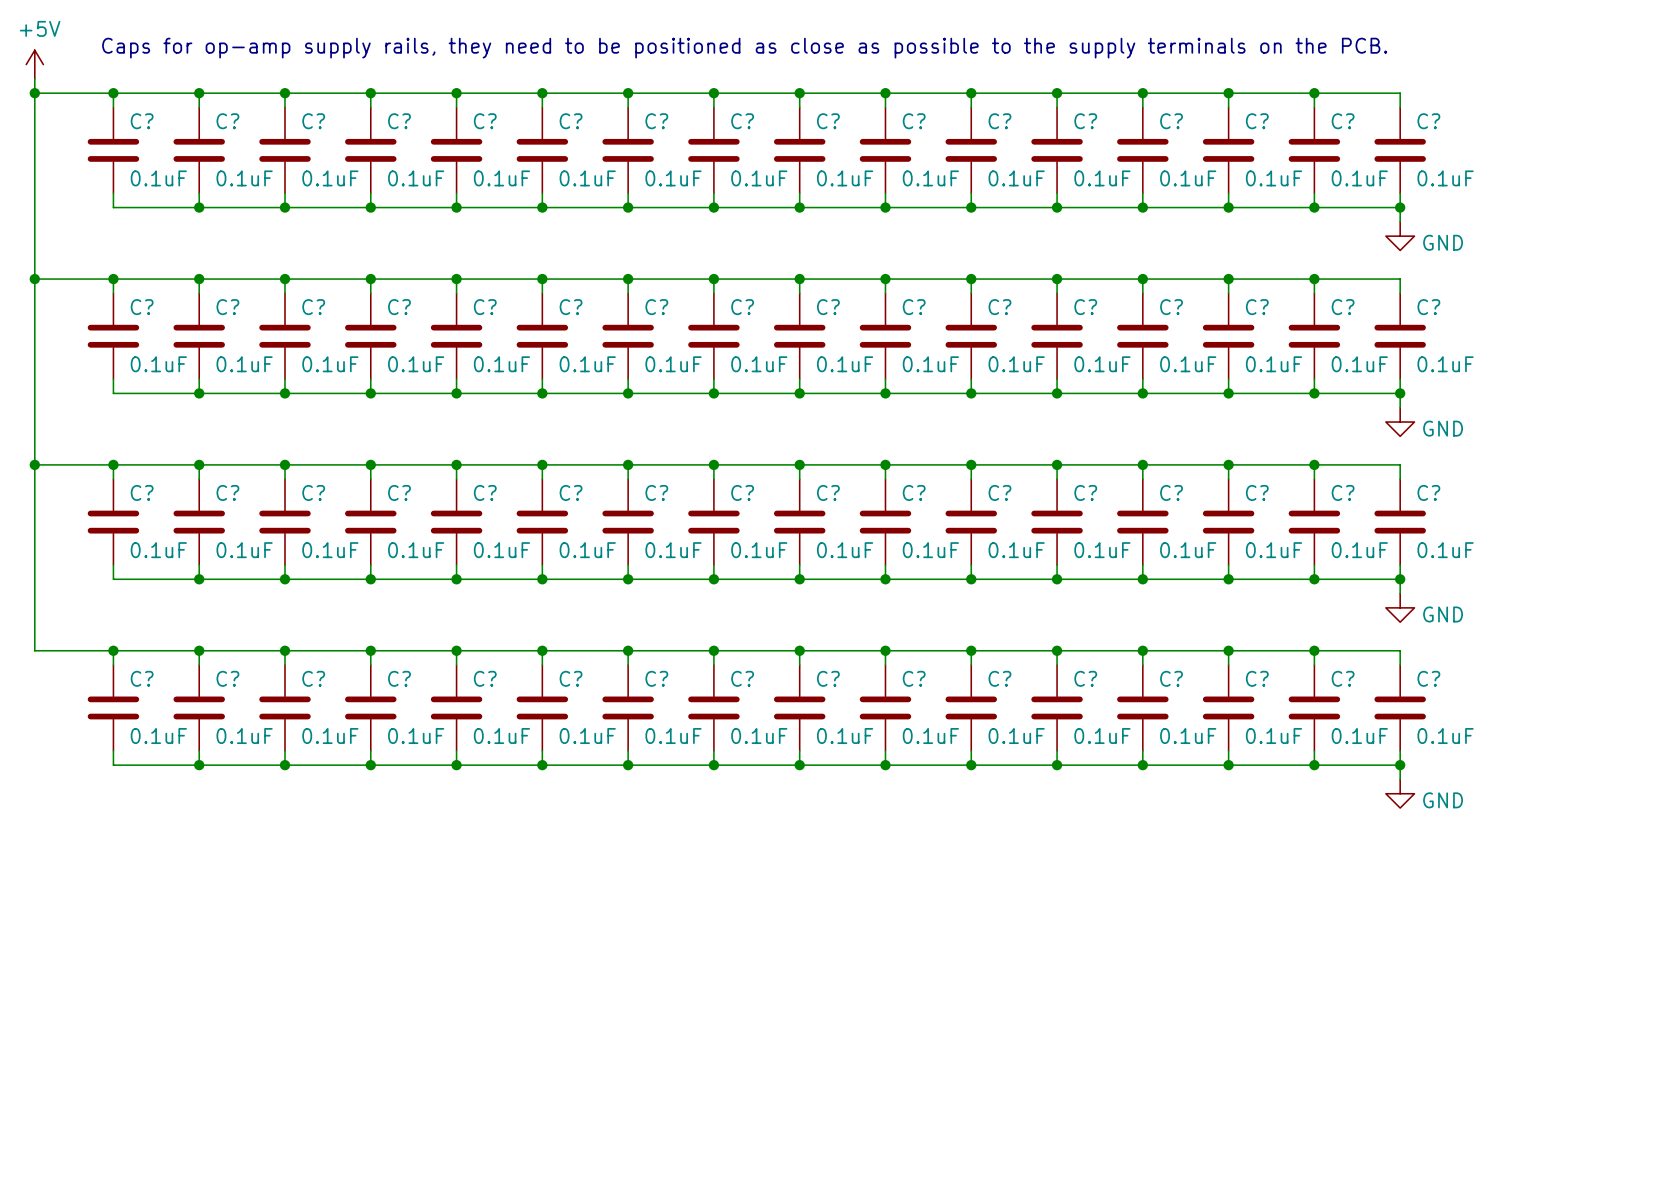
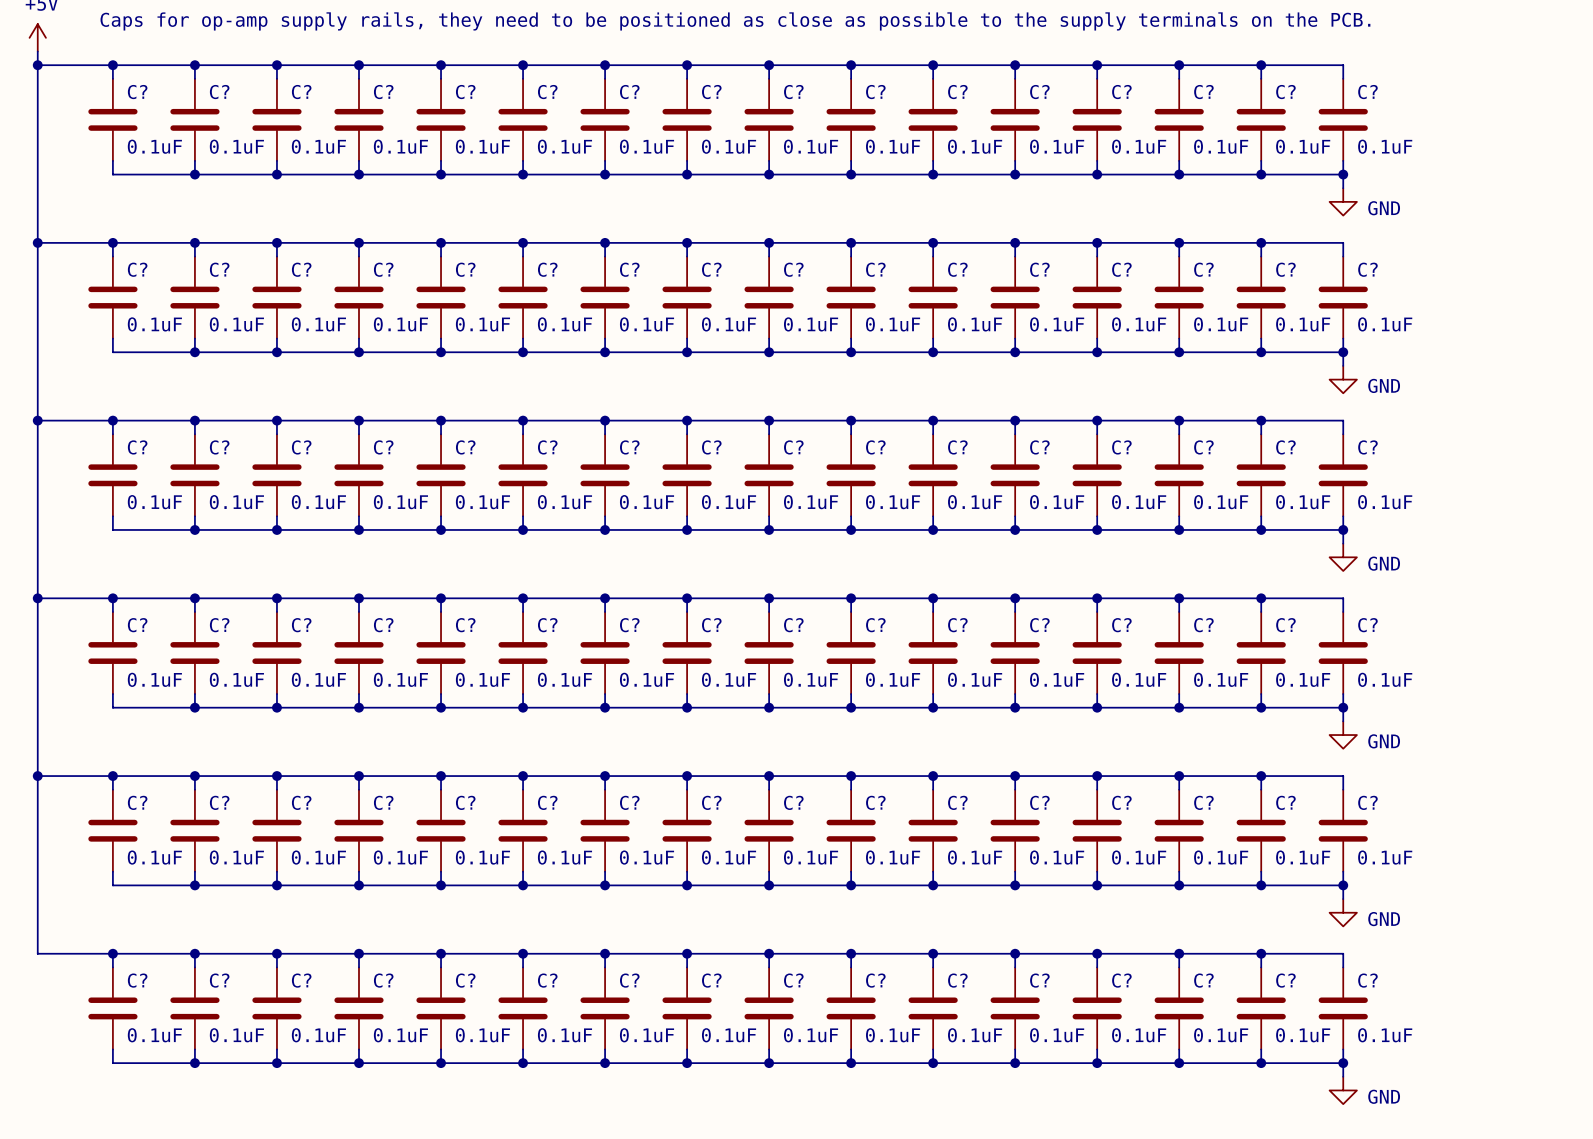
wire: none -> (37, 598) (37, 953) (1343, 953) (1343, 967)
junction: none -> (37, 598)
wire: none -> (37, 776) (1343, 776) (1343, 789)
junction: none -> (37, 776)
wire: none -> (112, 776) (112, 789)
junction: none -> (112, 776)
wire: none -> (194, 776) (194, 789)
junction: none -> (194, 776)
wire: none -> (276, 776) (276, 789)
junction: none -> (276, 776)
wire: none -> (358, 776) (358, 789)
junction: none -> (358, 776)
wire: none -> (441, 776) (441, 789)
junction: none -> (441, 776)
wire: none -> (523, 776) (523, 789)
junction: none -> (523, 776)
wire: none -> (605, 776) (605, 789)
junction: none -> (605, 776)
wire: none -> (687, 776) (687, 789)
junction: none -> (687, 776)
wire: none -> (769, 776) (769, 789)
junction: none -> (769, 776)
wire: none -> (851, 776) (851, 789)
junction: none -> (851, 776)
wire: none -> (933, 776) (933, 789)
junction: none -> (933, 776)
wire: none -> (1015, 776) (1015, 789)
junction: none -> (1015, 776)
wire: none -> (1097, 776) (1097, 789)
junction: none -> (1097, 776)
wire: none -> (1179, 776) (1179, 789)
junction: none -> (1179, 776)
wire: none -> (1261, 776) (1261, 789)
junction: none -> (1261, 776)
C?: none -> 0.1uF (112, 830)
C?: none -> 0.1uF (194, 830)
C?: none -> 0.1uF (276, 830)
C?: none -> 0.1uF (358, 830)
C?: none -> 0.1uF (441, 830)
C?: none -> 0.1uF (523, 830)
C?: none -> 0.1uF (605, 830)
C?: none -> 0.1uF (687, 830)
C?: none -> 0.1uF (769, 830)
C?: none -> 0.1uF (851, 830)
C?: none -> 0.1uF (933, 830)
C?: none -> 0.1uF (1015, 830)
C?: none -> 0.1uF (1097, 830)
C?: none -> 0.1uF (1179, 830)
C?: none -> 0.1uF (1261, 830)
C?: none -> 0.1uF (1343, 830)
wire: none -> (112, 871) (112, 885) (1343, 885)
wire: none -> (194, 871) (194, 885)
wire: none -> (276, 871) (276, 885)
wire: none -> (358, 871) (358, 885)
wire: none -> (441, 871) (441, 885)
wire: none -> (523, 871) (523, 885)
wire: none -> (605, 871) (605, 885)
wire: none -> (687, 871) (687, 885)
wire: none -> (769, 871) (769, 885)
wire: none -> (851, 871) (851, 885)
wire: none -> (933, 871) (933, 885)
wire: none -> (1015, 871) (1015, 885)
wire: none -> (1097, 871) (1097, 885)
wire: none -> (1179, 871) (1179, 885)
wire: none -> (1261, 871) (1261, 885)
wire: none -> (1343, 871) (1343, 899)
junction: none -> (194, 885)
junction: none -> (276, 885)
junction: none -> (358, 885)
junction: none -> (441, 885)
junction: none -> (523, 885)
junction: none -> (605, 885)
junction: none -> (687, 885)
junction: none -> (769, 885)
junction: none -> (851, 885)
junction: none -> (933, 885)
junction: none -> (1015, 885)
junction: none -> (1097, 885)
junction: none -> (1179, 885)
junction: none -> (1261, 885)
junction: none -> (1343, 885)
power symbol: none -> GND (1343, 912)
wire: none -> (112, 953) (112, 967)
junction: none -> (112, 953)
wire: none -> (194, 953) (194, 967)
junction: none -> (194, 953)
wire: none -> (276, 953) (276, 967)
junction: none -> (276, 953)
wire: none -> (358, 953) (358, 967)
junction: none -> (358, 953)
wire: none -> (441, 953) (441, 967)
junction: none -> (441, 953)
wire: none -> (523, 953) (523, 967)
junction: none -> (523, 953)
wire: none -> (605, 953) (605, 967)
junction: none -> (605, 953)
wire: none -> (687, 953) (687, 967)
junction: none -> (687, 953)
wire: none -> (769, 953) (769, 967)
junction: none -> (769, 953)
wire: none -> (851, 953) (851, 967)
junction: none -> (851, 953)
wire: none -> (933, 953) (933, 967)
junction: none -> (933, 953)
wire: none -> (1015, 953) (1015, 967)
junction: none -> (1015, 953)
wire: none -> (1097, 953) (1097, 967)
junction: none -> (1097, 953)
wire: none -> (1179, 953) (1179, 967)
junction: none -> (1179, 953)
wire: none -> (1261, 953) (1261, 967)
junction: none -> (1261, 953)
C?: none -> 0.1uF (112, 1008)
C?: none -> 0.1uF (194, 1008)
C?: none -> 0.1uF (276, 1008)
C?: none -> 0.1uF (358, 1008)
C?: none -> 0.1uF (441, 1008)
C?: none -> 0.1uF (523, 1008)
C?: none -> 0.1uF (605, 1008)
C?: none -> 0.1uF (687, 1008)
C?: none -> 0.1uF (769, 1008)
C?: none -> 0.1uF (851, 1008)
C?: none -> 0.1uF (933, 1008)
C?: none -> 0.1uF (1015, 1008)
C?: none -> 0.1uF (1097, 1008)
C?: none -> 0.1uF (1179, 1008)
C?: none -> 0.1uF (1261, 1008)
C?: none -> 0.1uF (1343, 1008)
wire: none -> (112, 1049) (112, 1063) (1343, 1063)
wire: none -> (194, 1049) (194, 1063)
wire: none -> (276, 1049) (276, 1063)
wire: none -> (358, 1049) (358, 1063)
wire: none -> (441, 1049) (441, 1063)
wire: none -> (523, 1049) (523, 1063)
wire: none -> (605, 1049) (605, 1063)
wire: none -> (687, 1049) (687, 1063)
wire: none -> (769, 1049) (769, 1063)
wire: none -> (851, 1049) (851, 1063)
wire: none -> (933, 1049) (933, 1063)
wire: none -> (1015, 1049) (1015, 1063)
wire: none -> (1097, 1049) (1097, 1063)
wire: none -> (1179, 1049) (1179, 1063)
wire: none -> (1261, 1049) (1261, 1063)
wire: none -> (1343, 1049) (1343, 1076)
junction: none -> (194, 1063)
junction: none -> (276, 1063)
junction: none -> (358, 1063)
junction: none -> (441, 1063)
junction: none -> (523, 1063)
junction: none -> (605, 1063)
junction: none -> (687, 1063)
junction: none -> (769, 1063)
junction: none -> (851, 1063)
junction: none -> (933, 1063)
junction: none -> (1015, 1063)
junction: none -> (1097, 1063)
junction: none -> (1179, 1063)
junction: none -> (1261, 1063)
junction: none -> (1343, 1063)
power symbol: none -> GND (1343, 1090)

